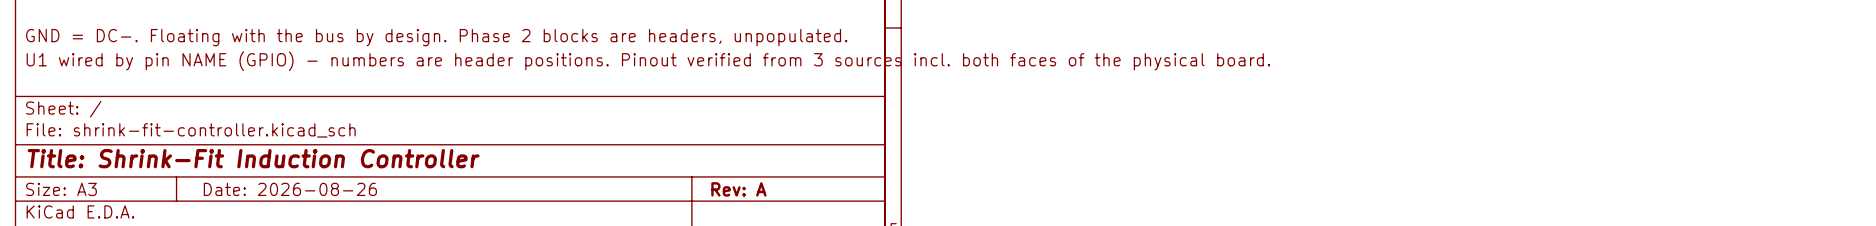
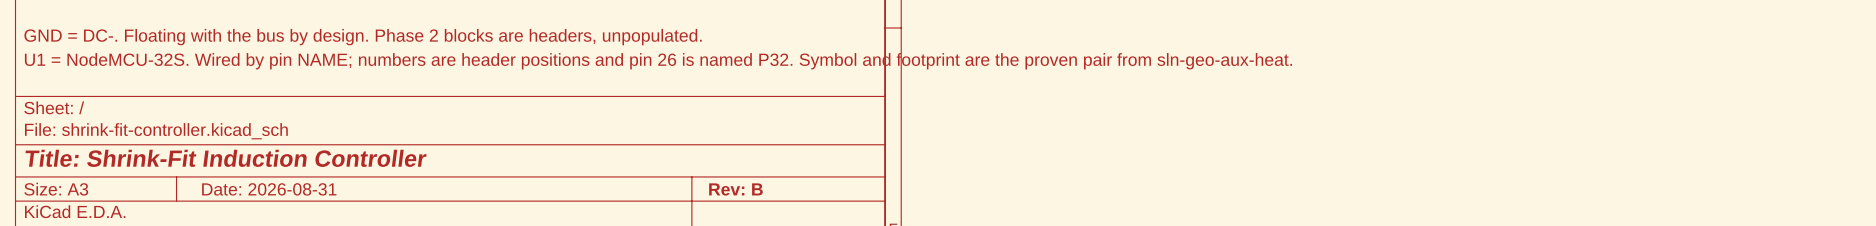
title block: U1 wired by pin NAME (GPIO) - numbers are header positions. Pinout verified from 3 sources incl. both faces of the physical board. (648, 61) -> U1 = NodeMCU-32S. Wired by pin NAME; numbers are header positions and pin 26 is named P32. Symbol and footprint are the proven pair from sln-geo-aux-heat. (658, 61)
title block: Date: 2026-08-26 (290, 189) -> Date: 2026-08-31 (269, 189)
title block: Rev: A (738, 189) -> Rev: B (735, 189)

